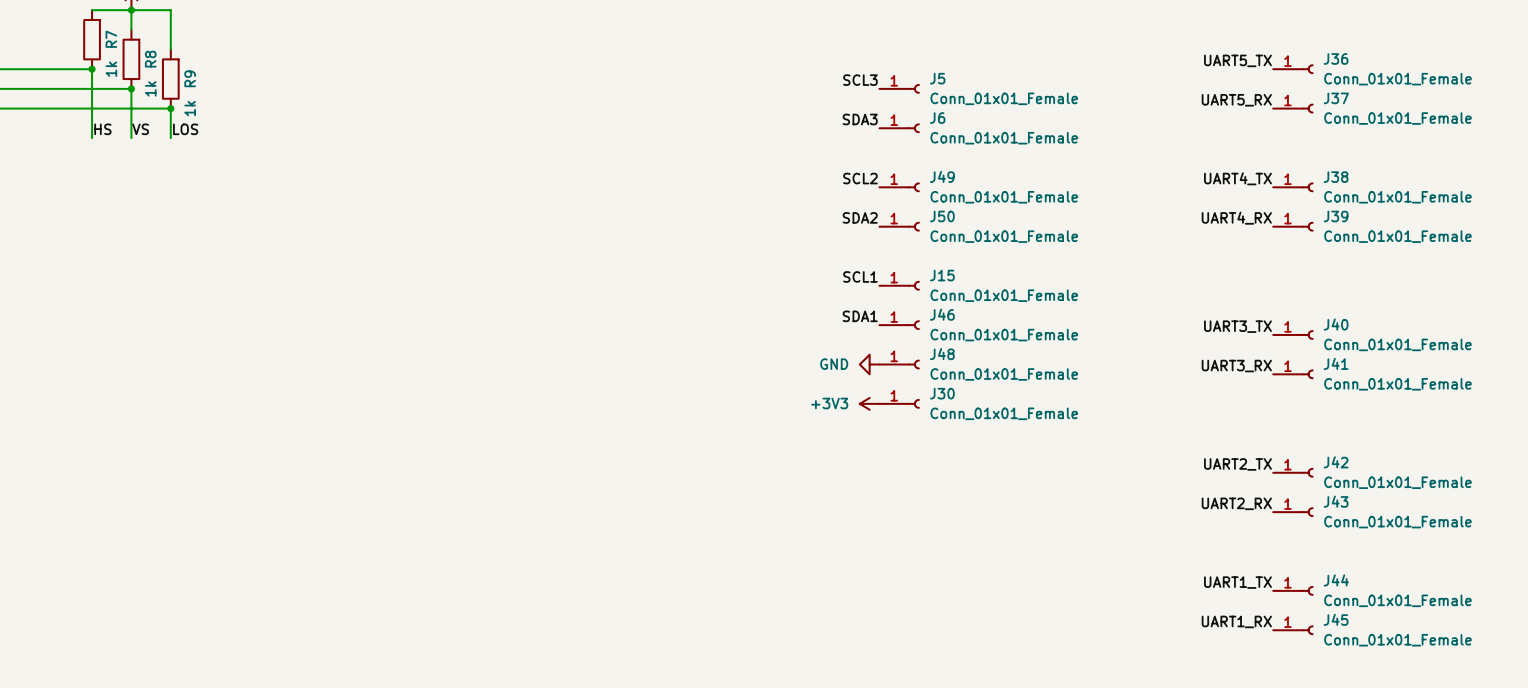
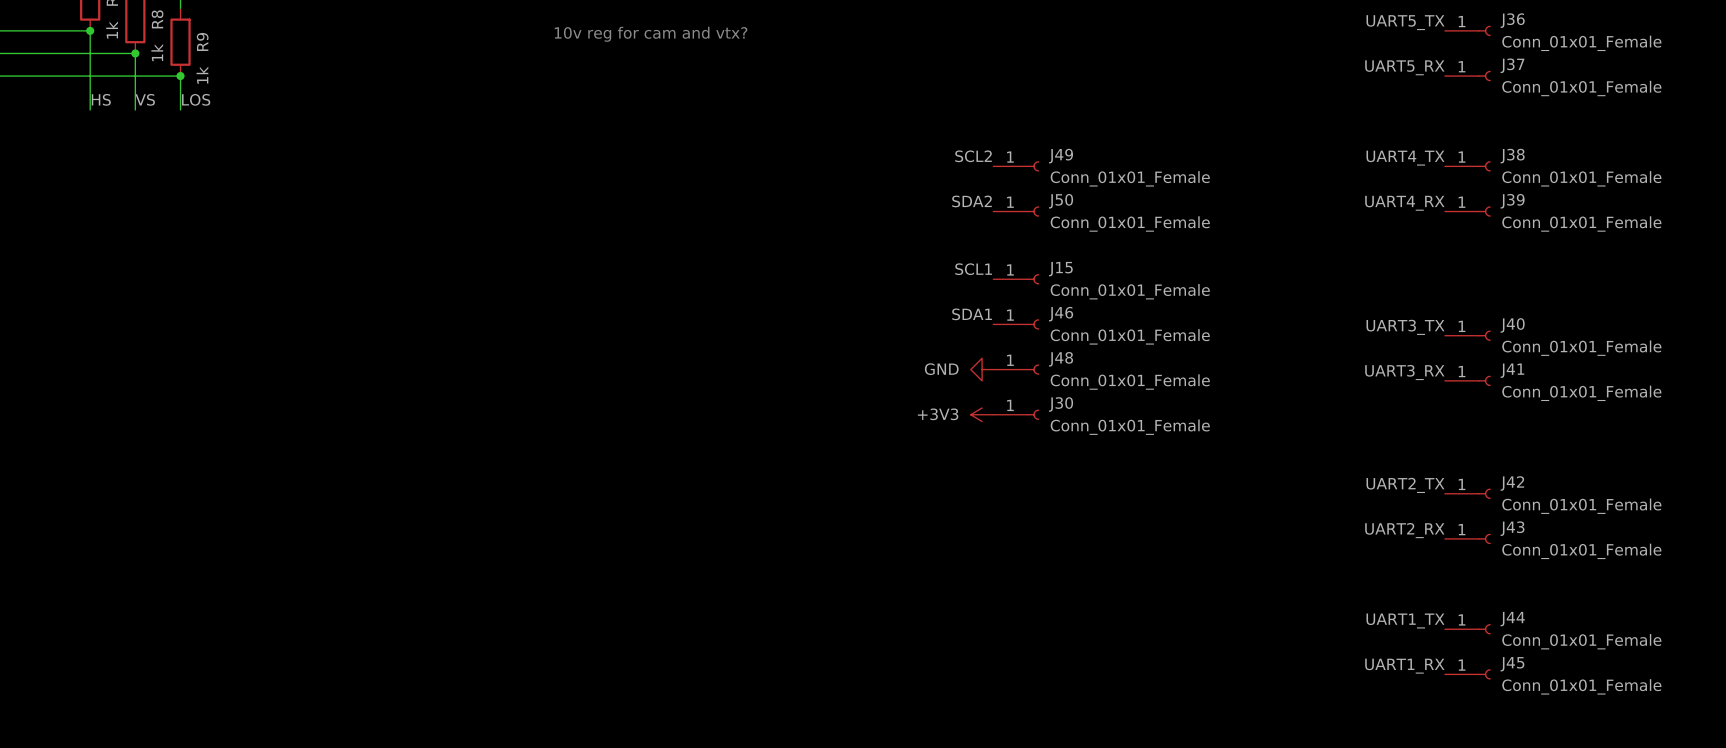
text: none -> 10v reg for cam and vtx? (651, 34)
label: SCL3 (860, 80) -> none
J5: Conn_01x01_Female (899, 88) -> none
label: SDA3 (860, 119) -> none
J6: Conn_01x01_Female (899, 128) -> none

